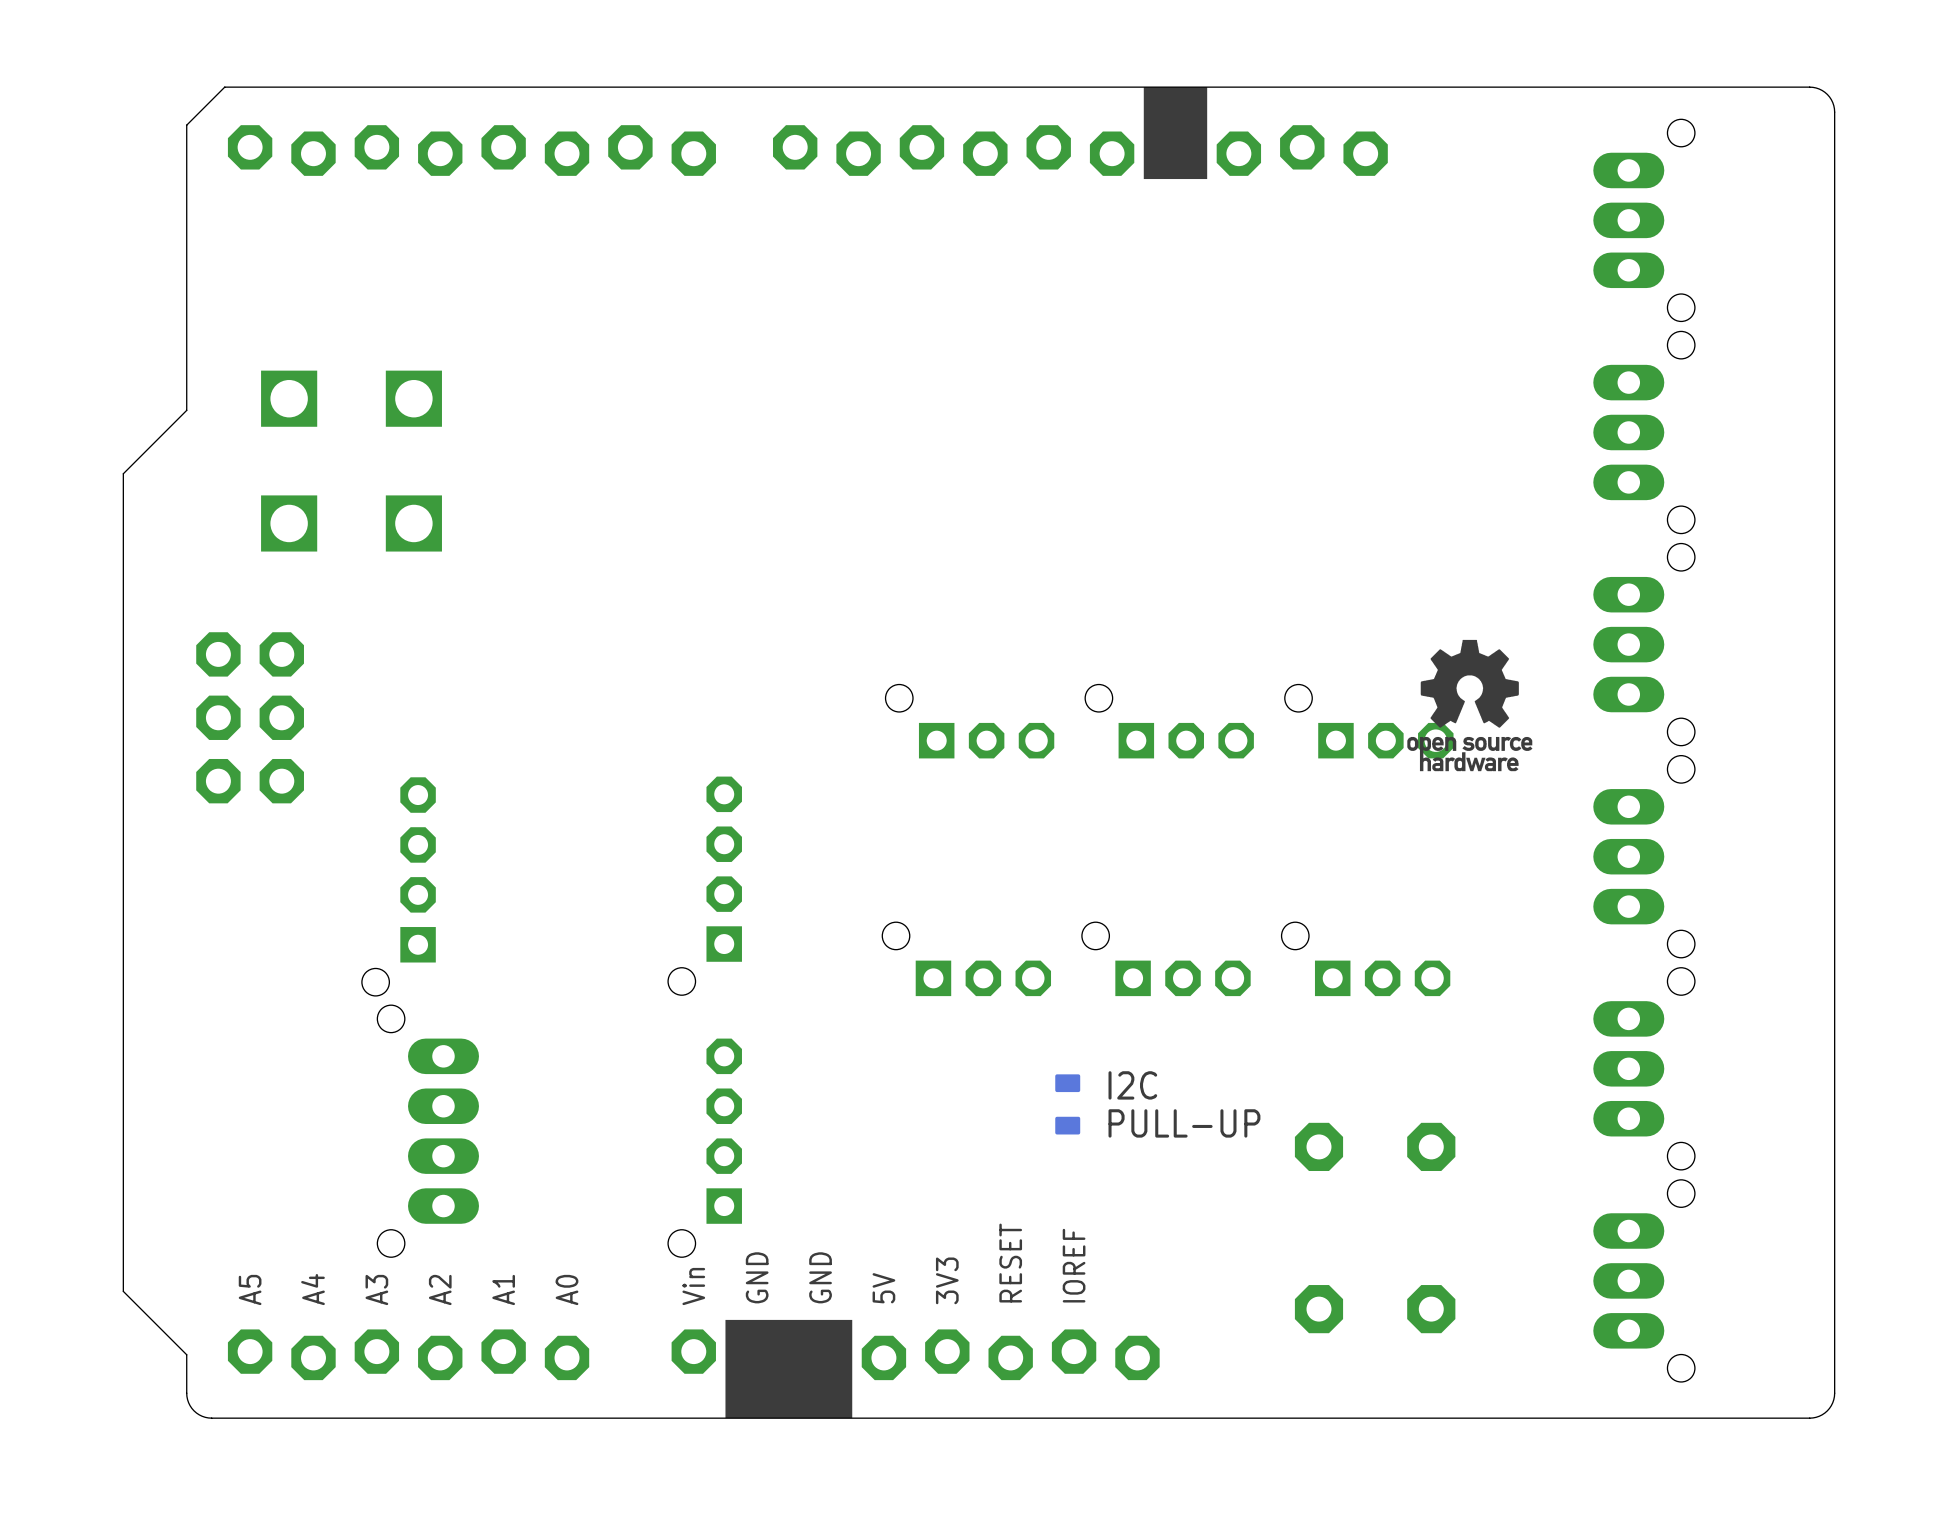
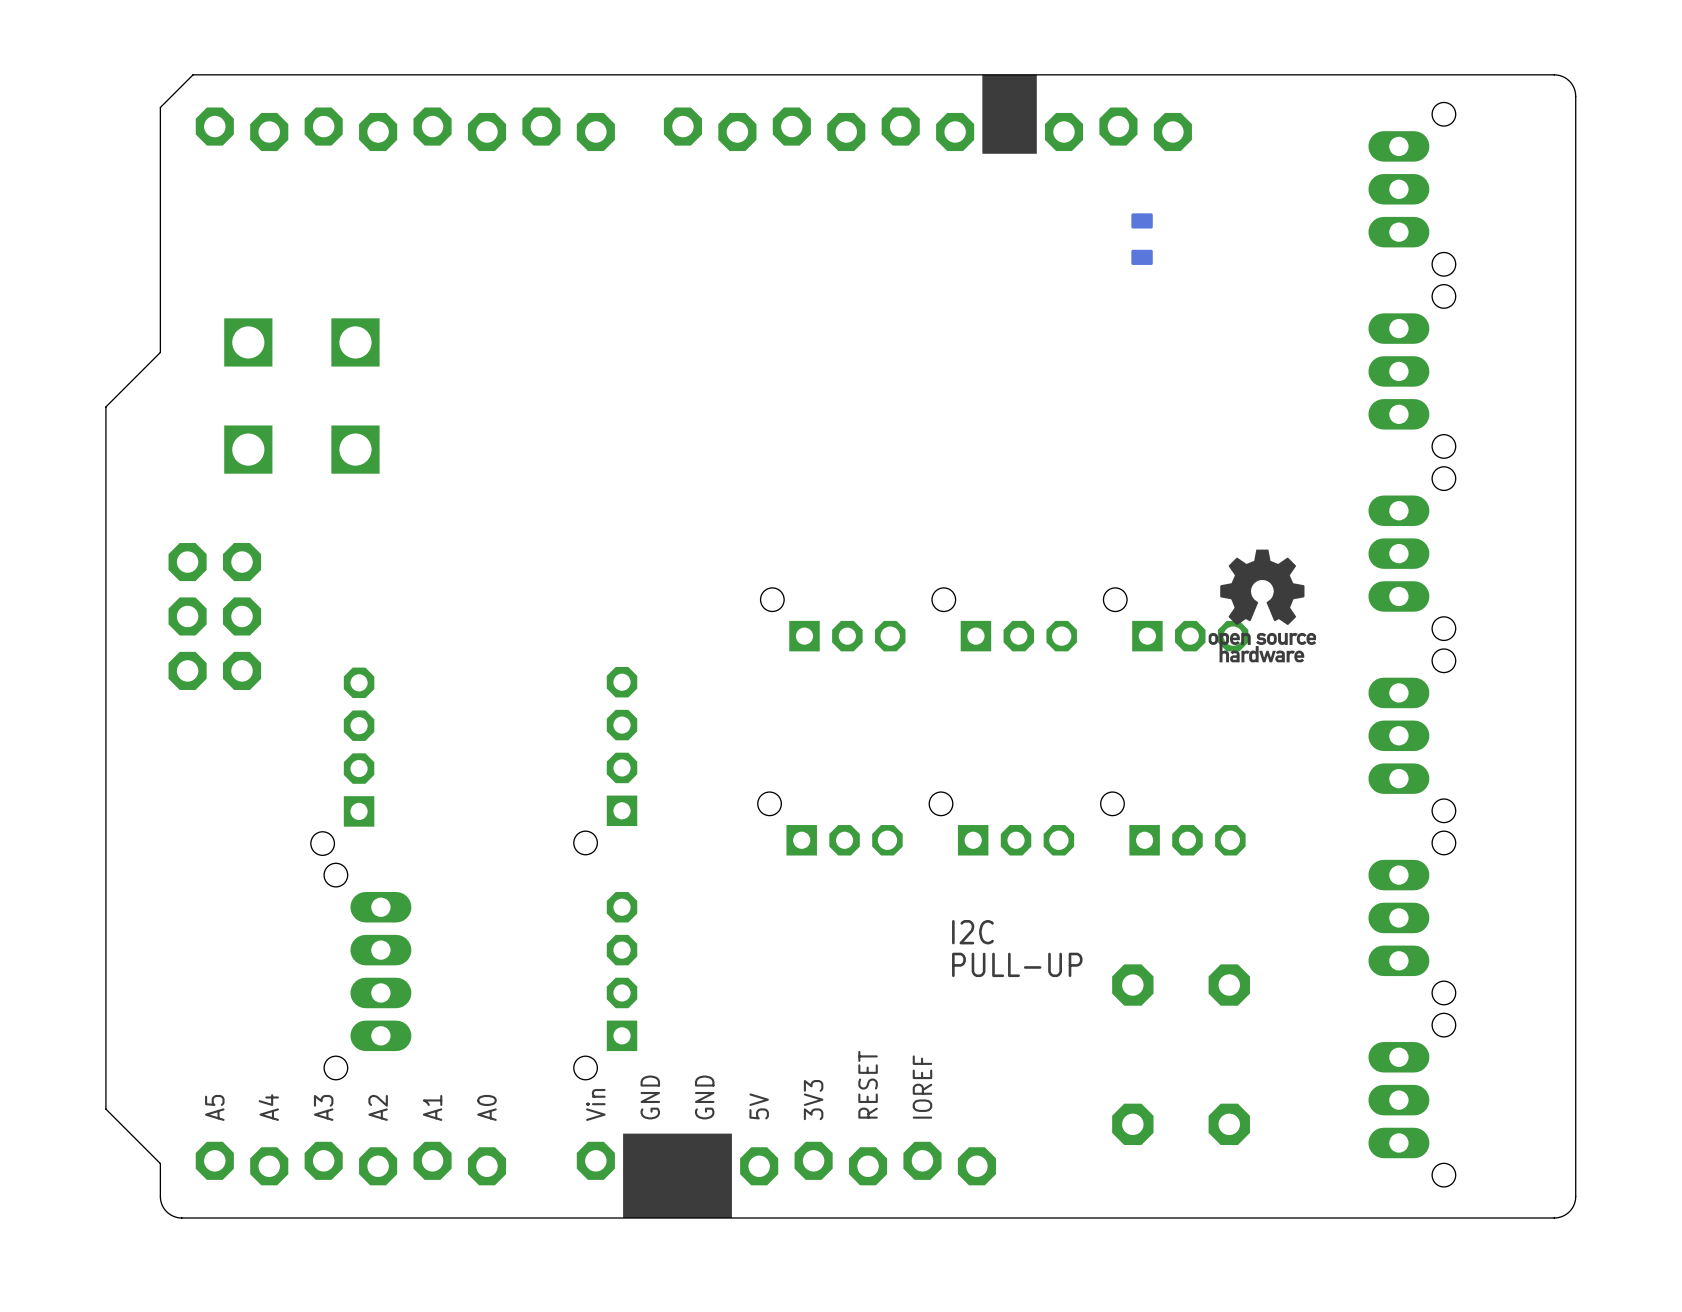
part: none -> (1142, 239)
part: (1067, 1104) -> none

